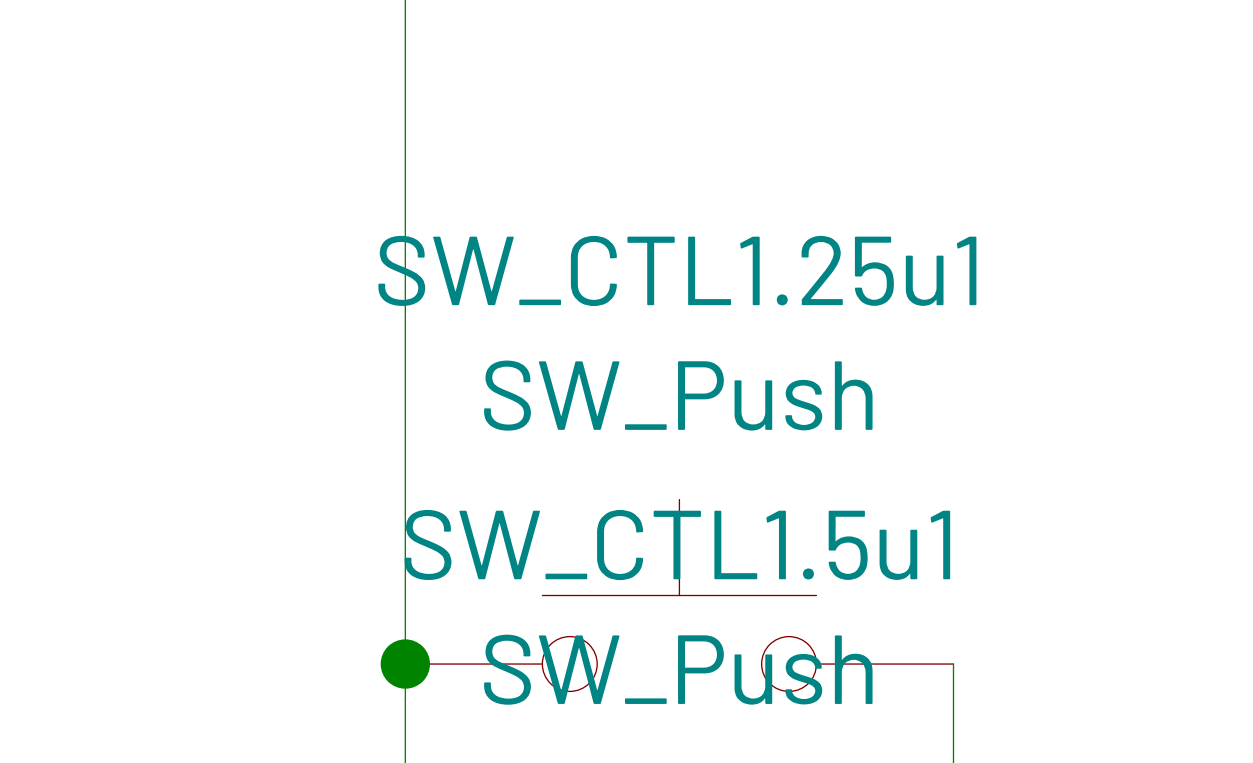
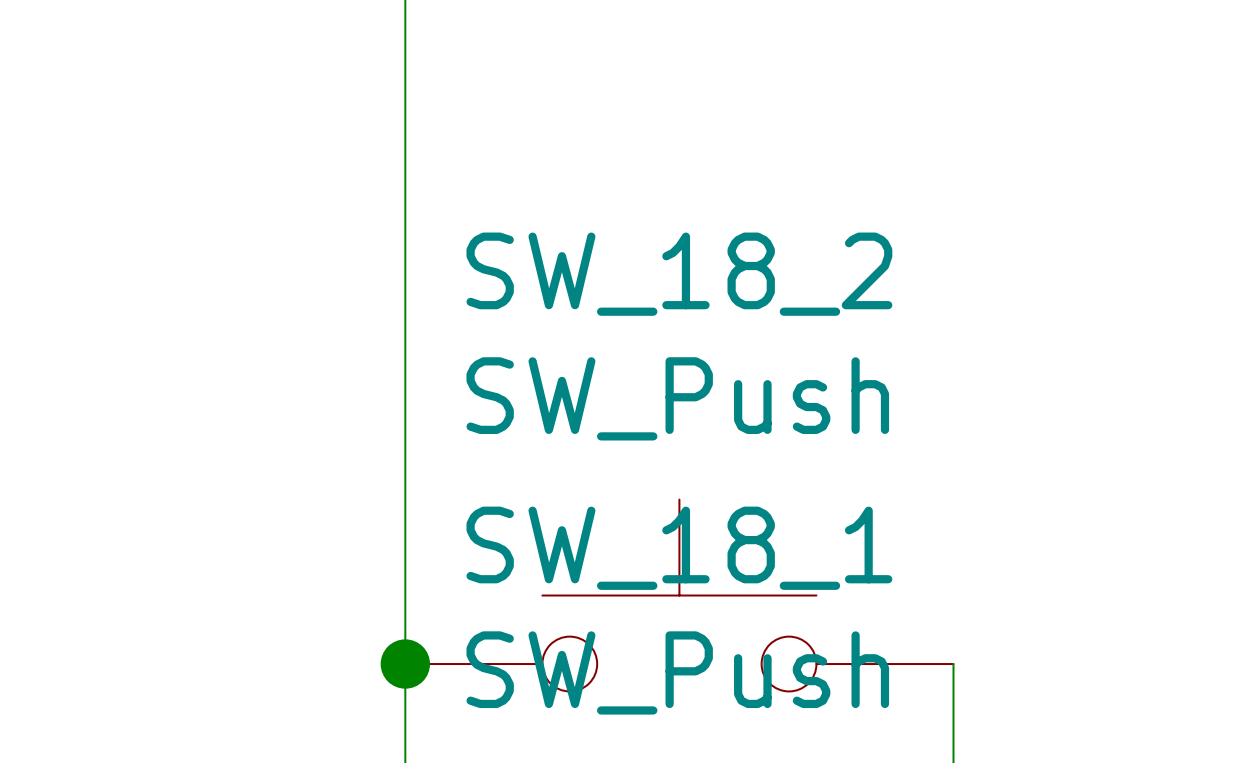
SW_CTL1.25u1 name: SW_CTL1.25u1 (677, 270) -> SW_18_2 (679, 274)
SW_CTL1.5u1 name: SW_CTL1.5u1 (677, 545) -> SW_18_1 (679, 548)

